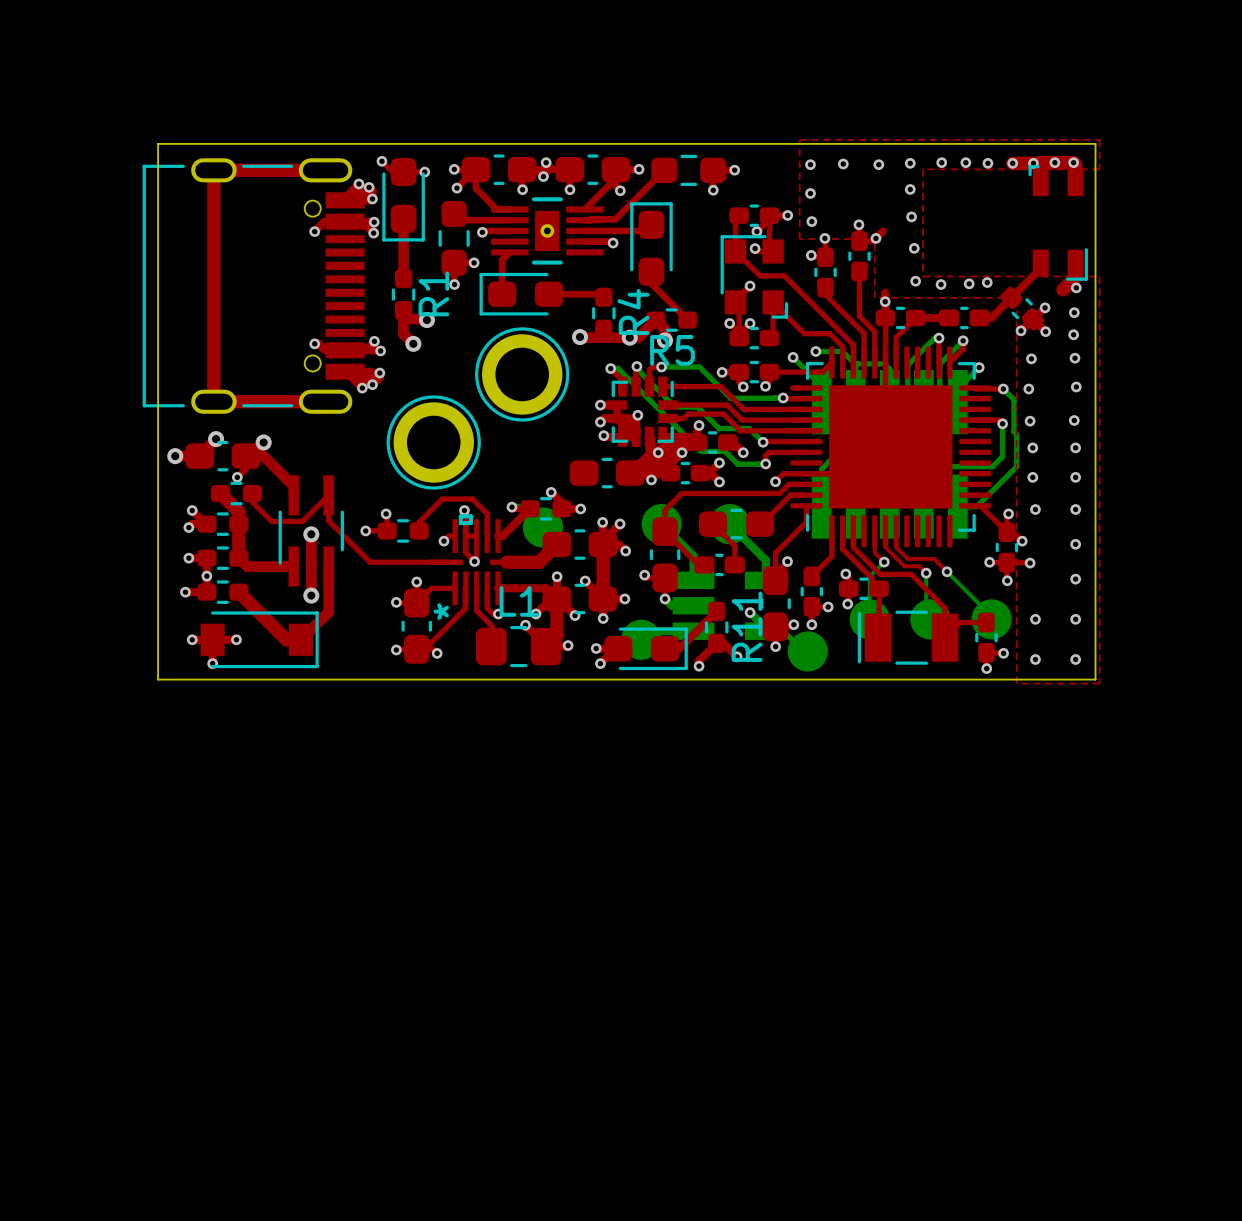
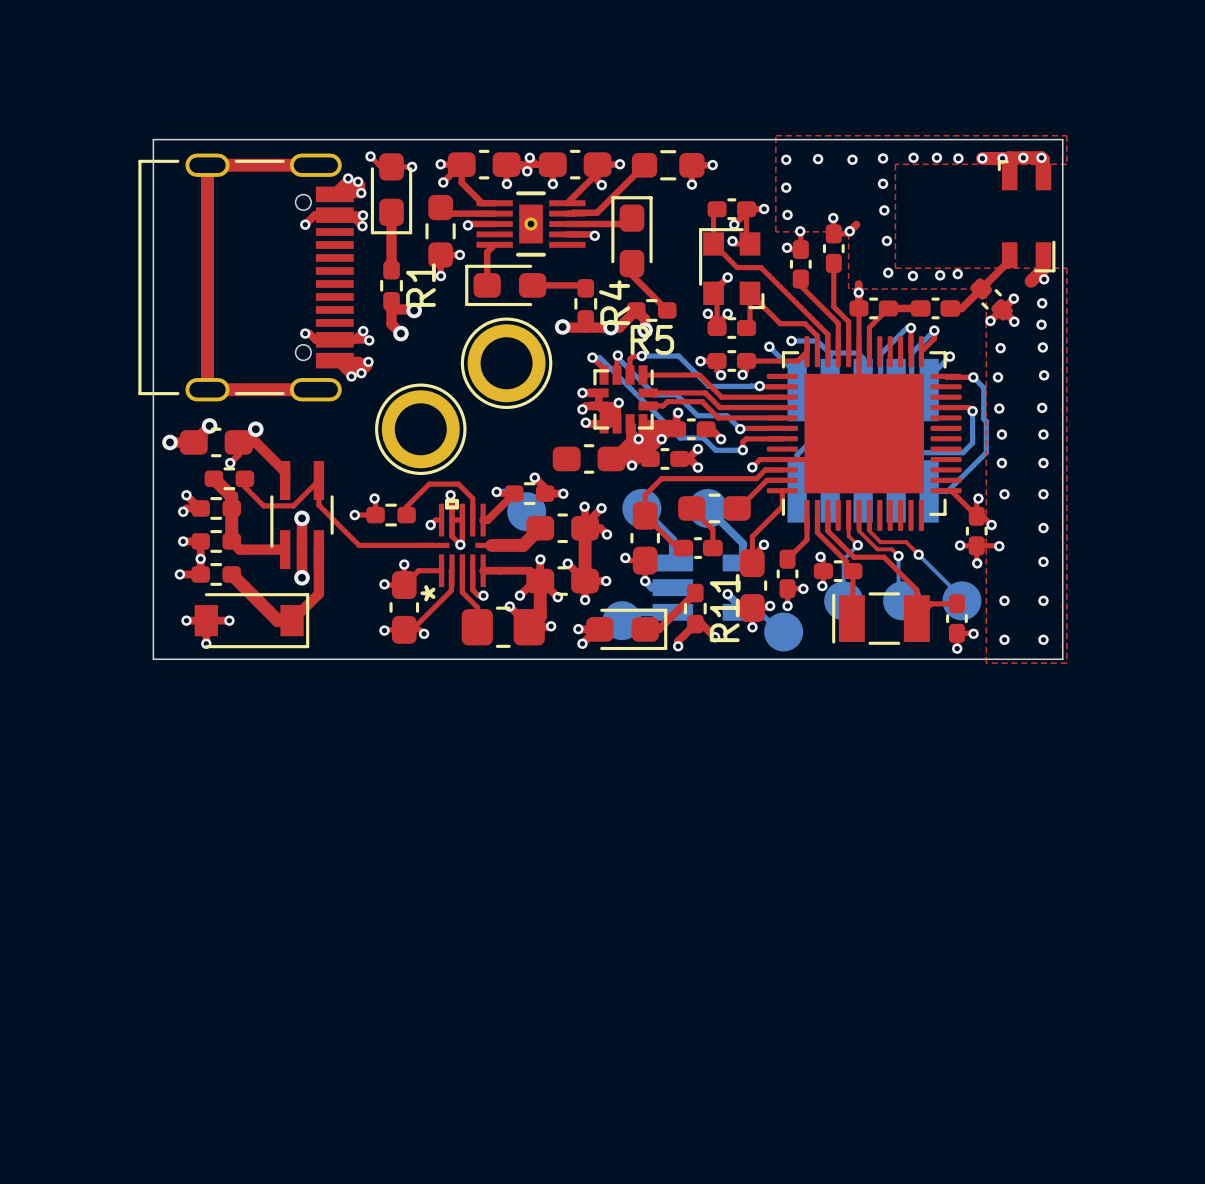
L1: (518, 646) -> none
part: none -> (503, 627)

